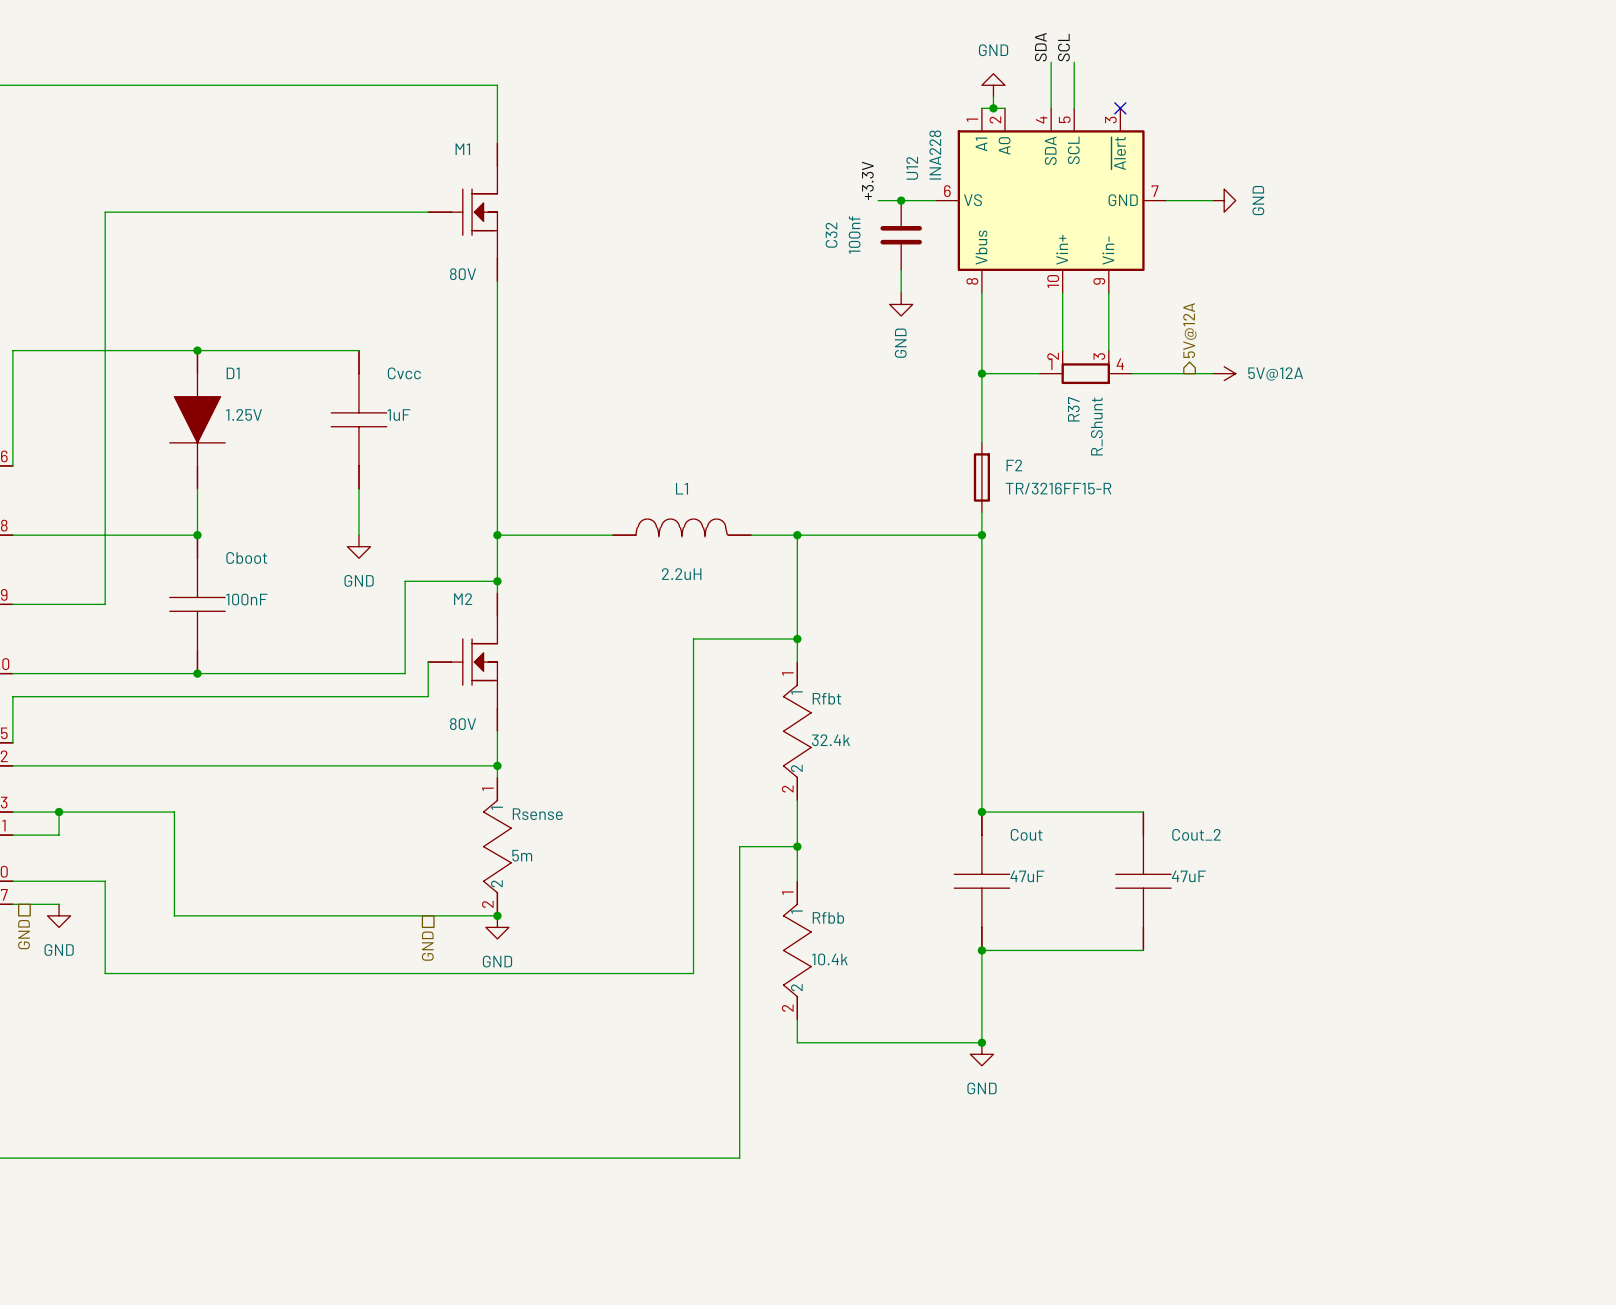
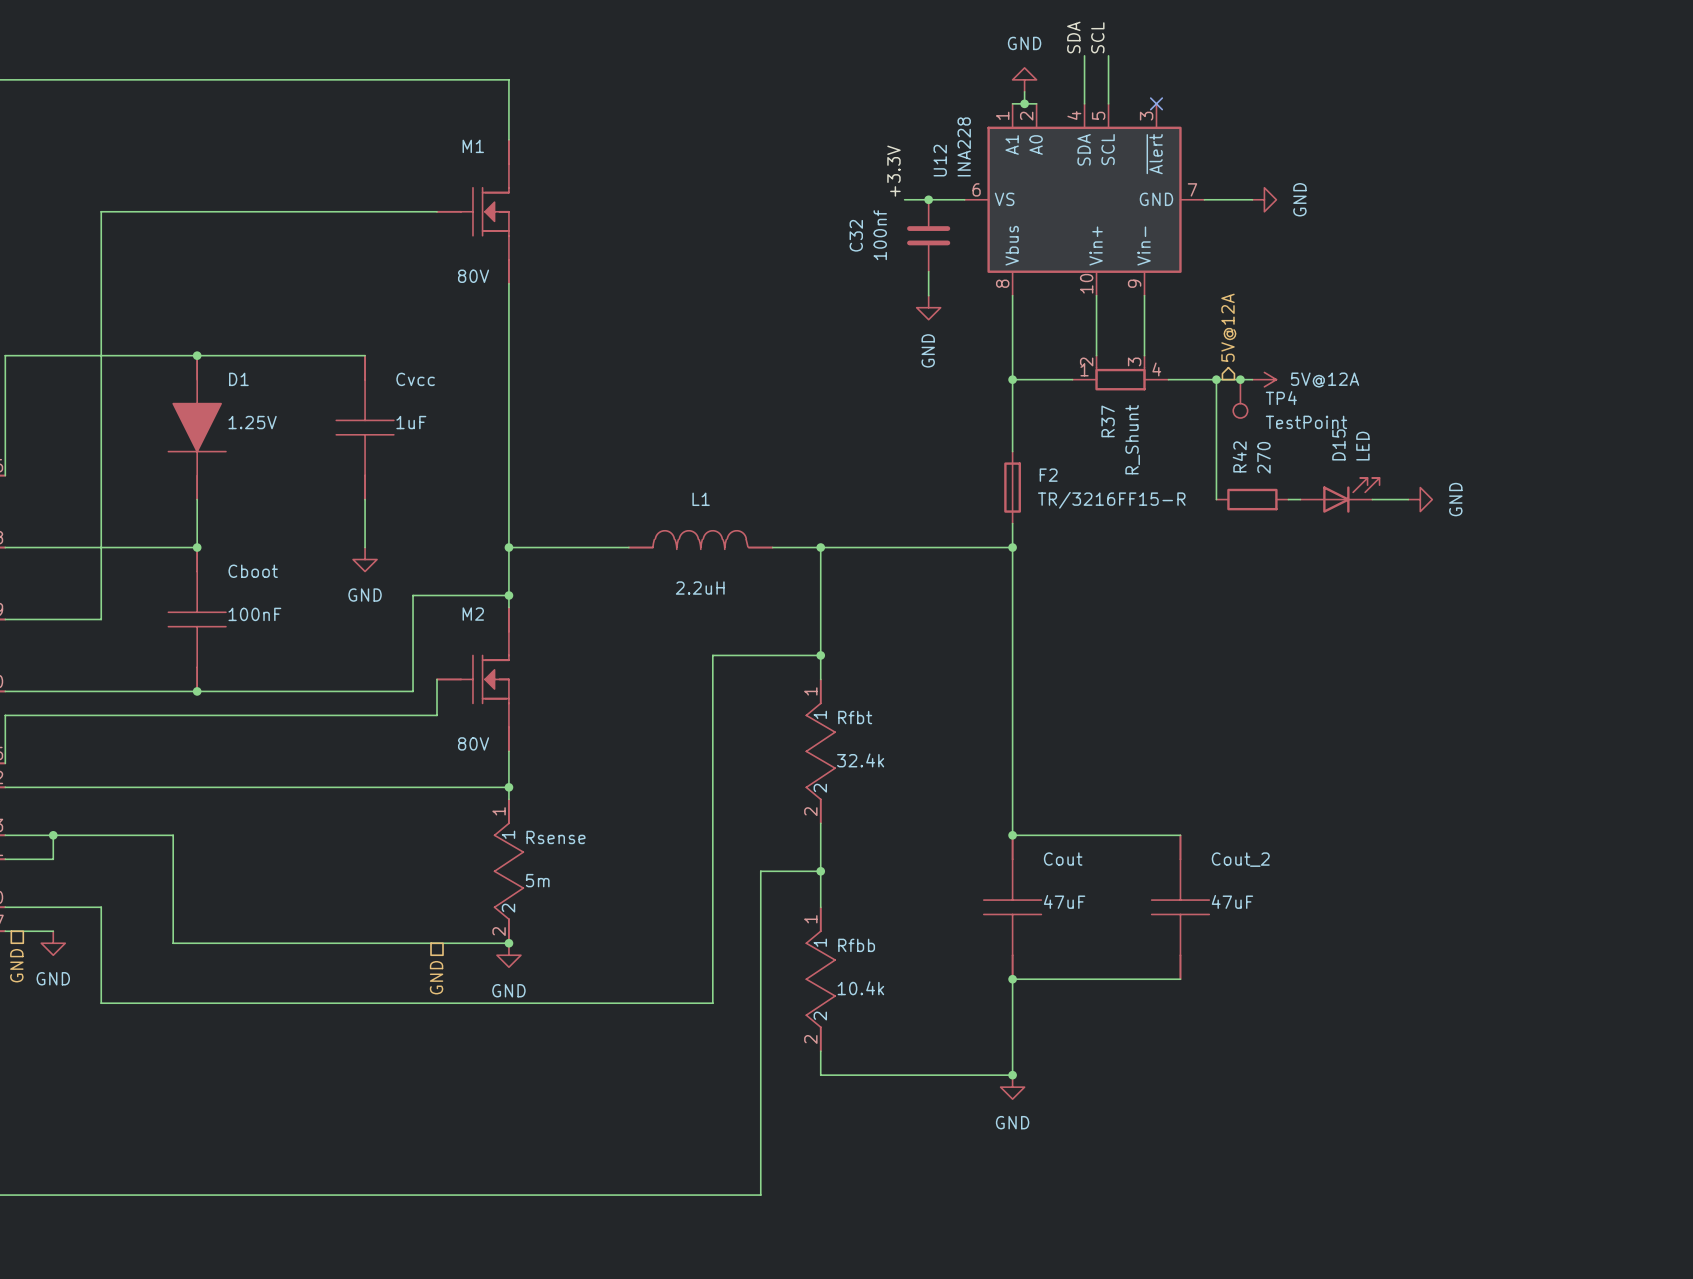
wire: none -> (1216, 379) (1216, 499)
junction: none -> (1216, 379)
junction: none -> (1240, 379)
TP4: none -> TestPoint (1240, 398)
D15: none -> LED (1339, 495)
R42: none -> 270 (1252, 499)
wire: none -> (1288, 499) (1300, 499)
wire: none -> (1372, 499) (1408, 499)
power symbol: none -> GND (1420, 499)

